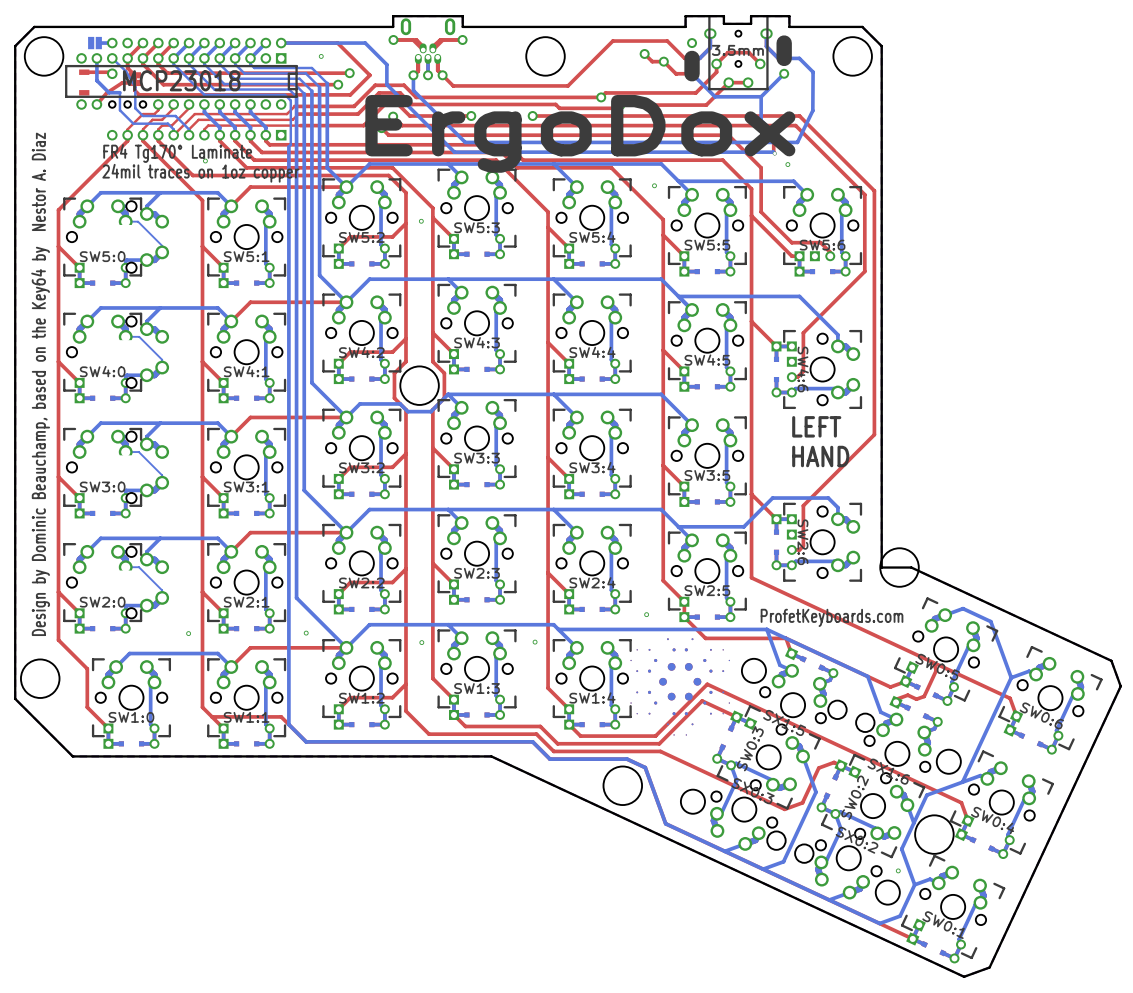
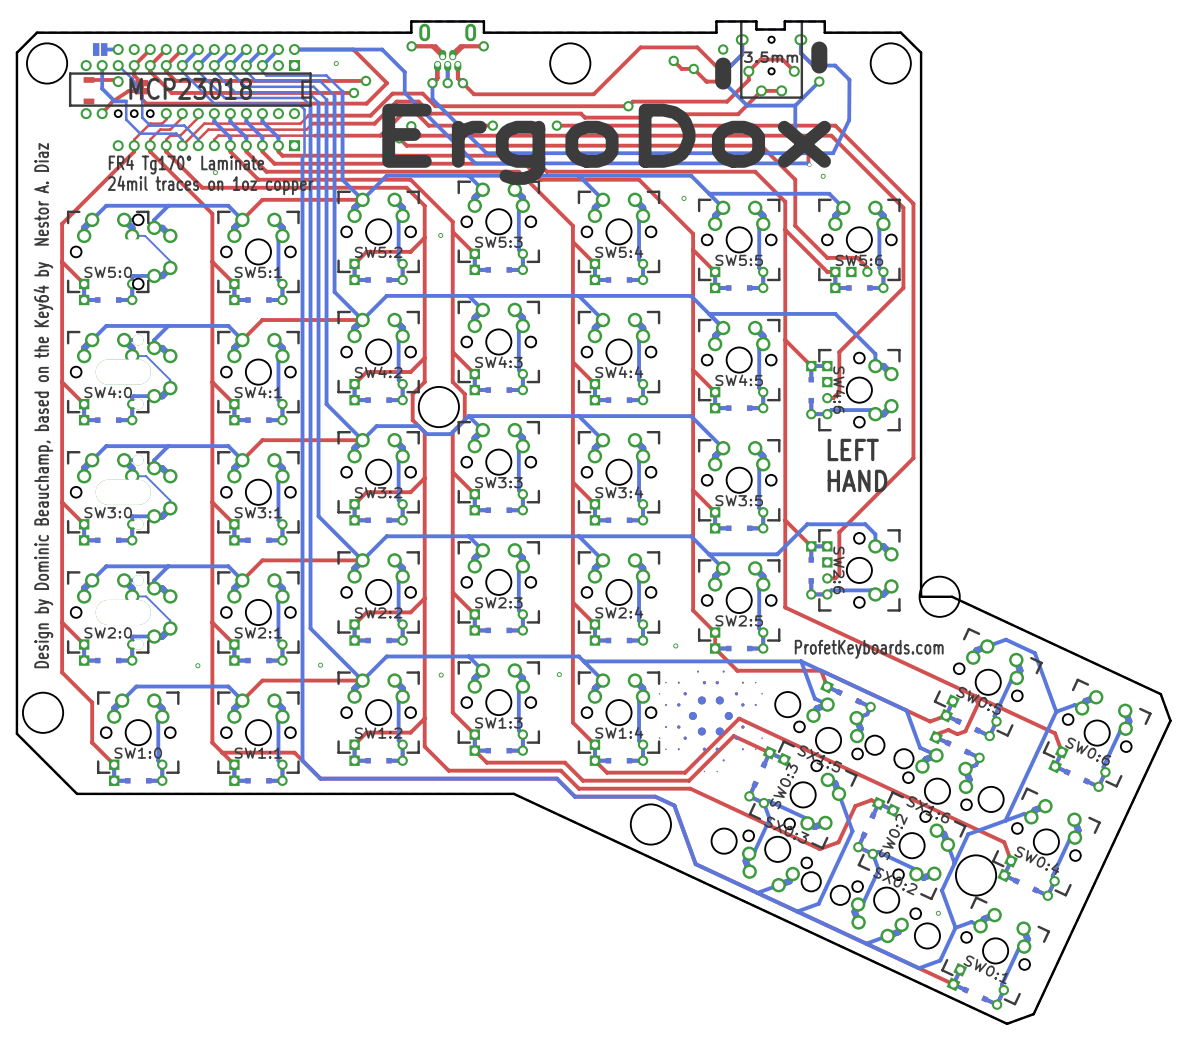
part footprint: [63, 312, 170, 404] -> [66, 330, 178, 426]
part footprint: [63, 427, 170, 519] -> [66, 451, 178, 546]
part footprint: [63, 543, 170, 634] -> [66, 571, 178, 666]

